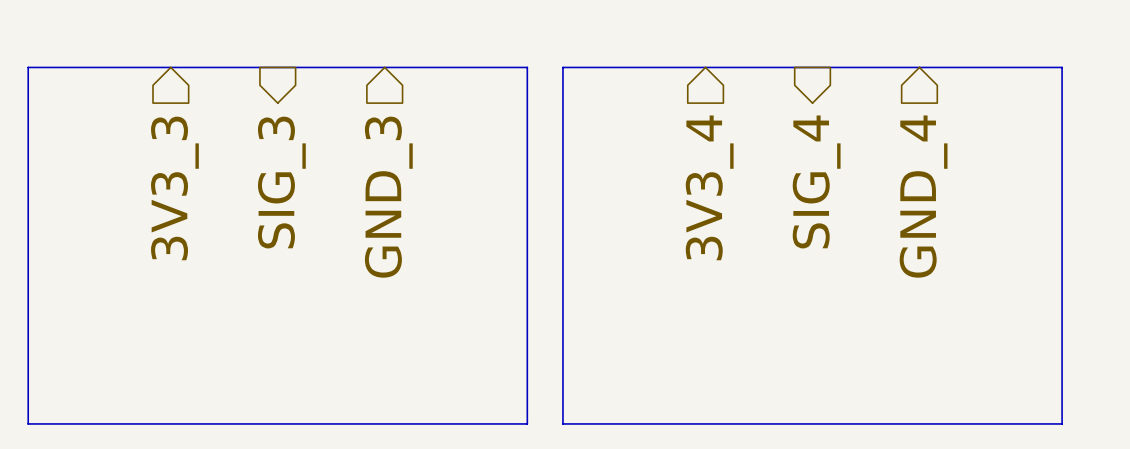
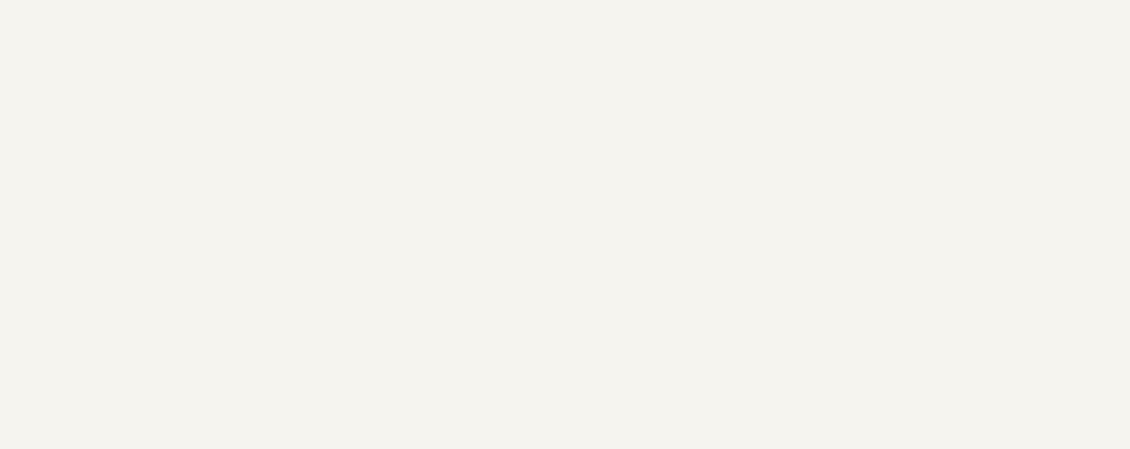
line: (28, 67) (527, 67) (527, 423) (28, 423) (28, 67) -> none
line: (562, 67) (1062, 67) (1062, 423) (562, 423) (562, 67) -> none
hierarchical label: SIG_4 (816, 181) -> none
hierarchical label: SIG_3 (281, 182) -> none
hierarchical label: 3V3_4 (709, 187) -> none
hierarchical label: 3V3_3 (174, 188) -> none
hierarchical label: GND_4 (923, 196) -> none
hierarchical label: GND_3 (388, 197) -> none

